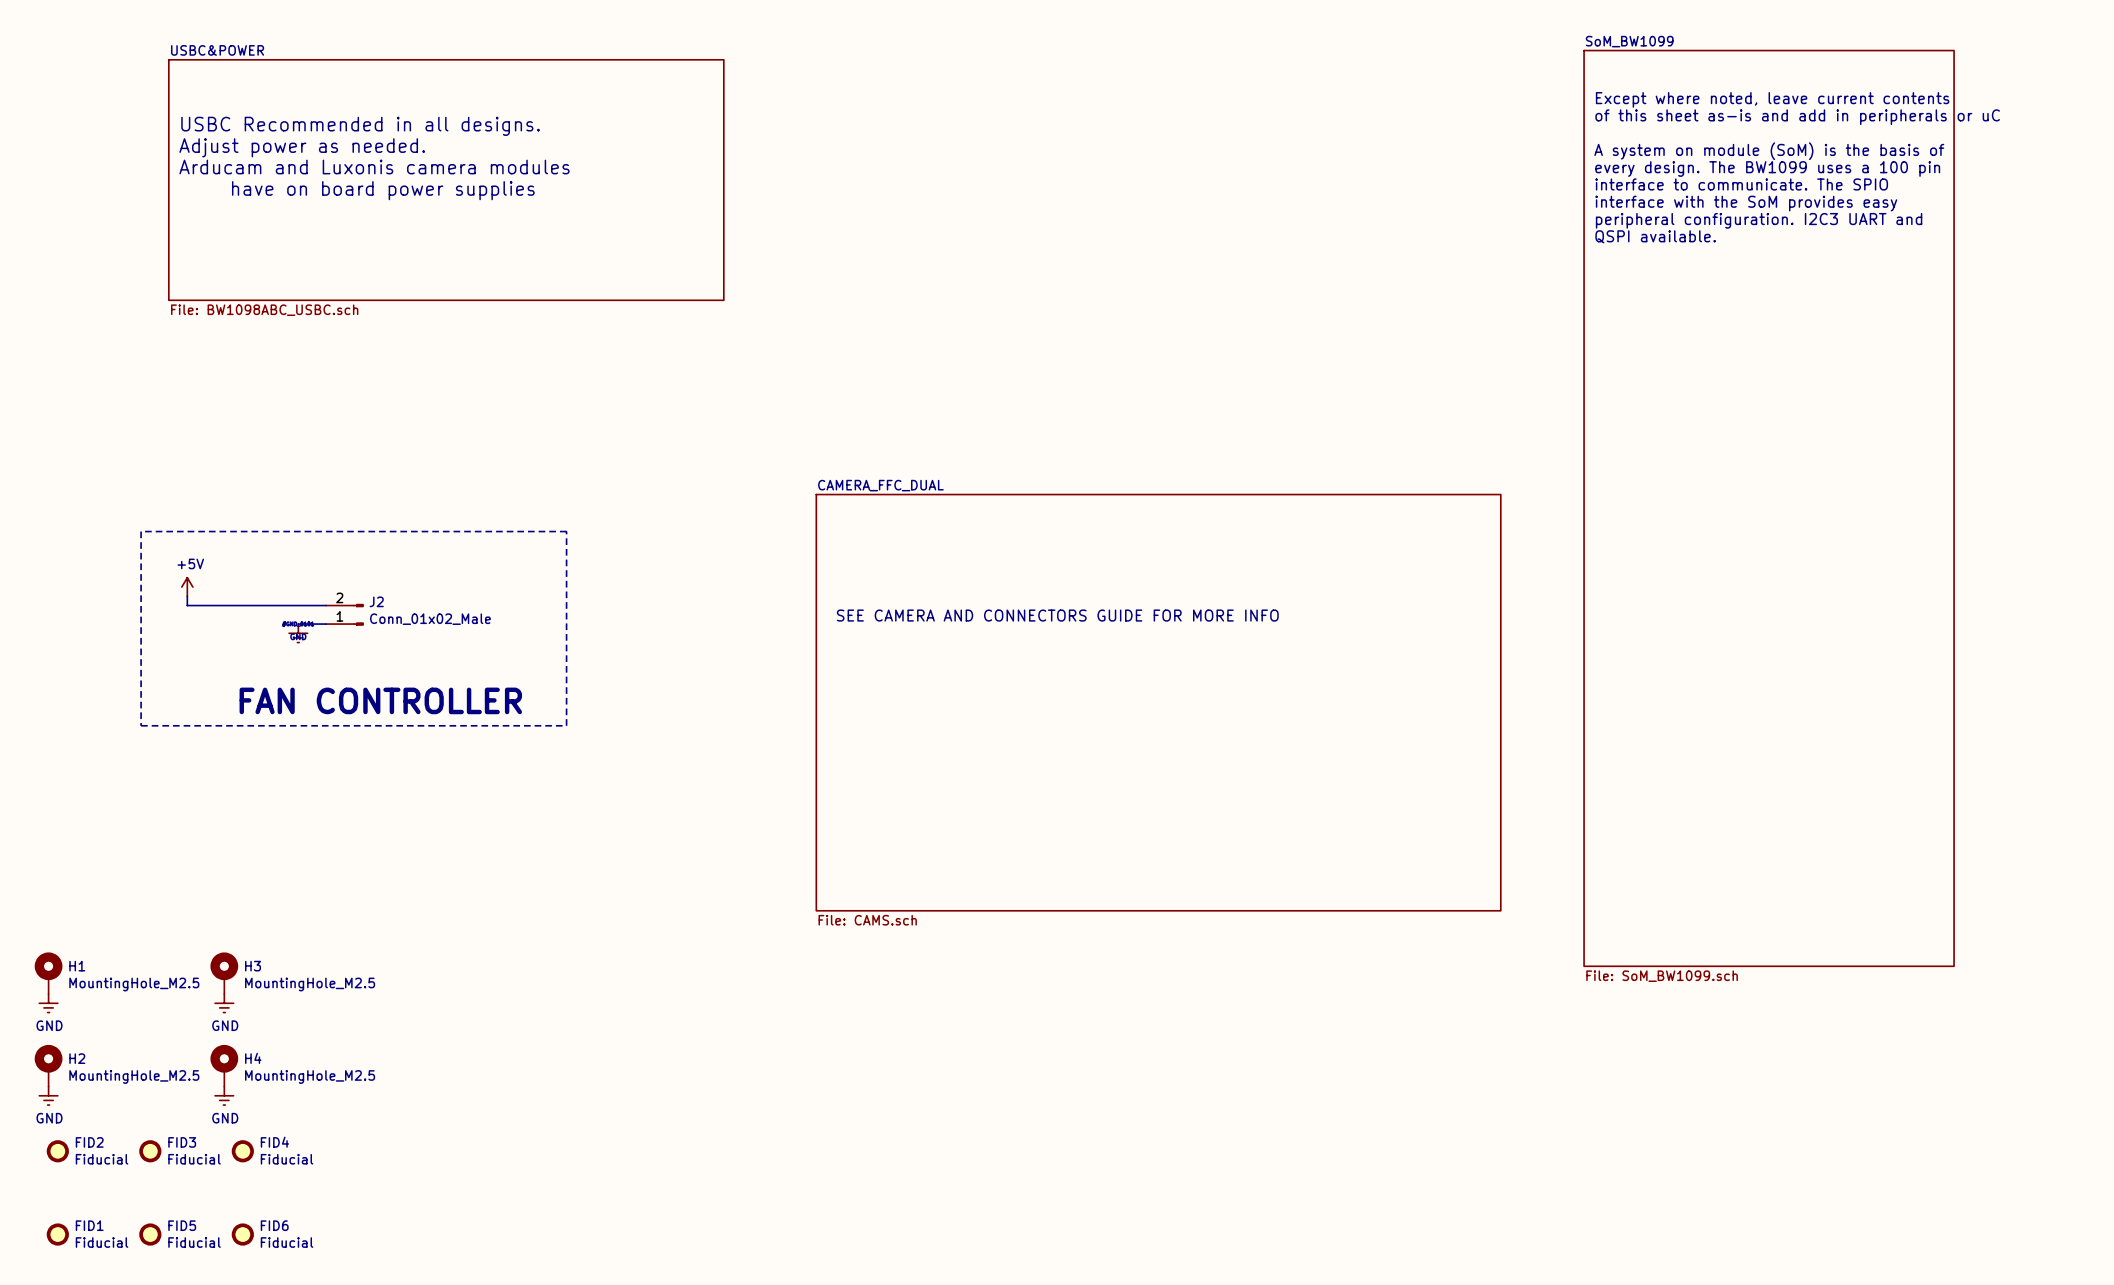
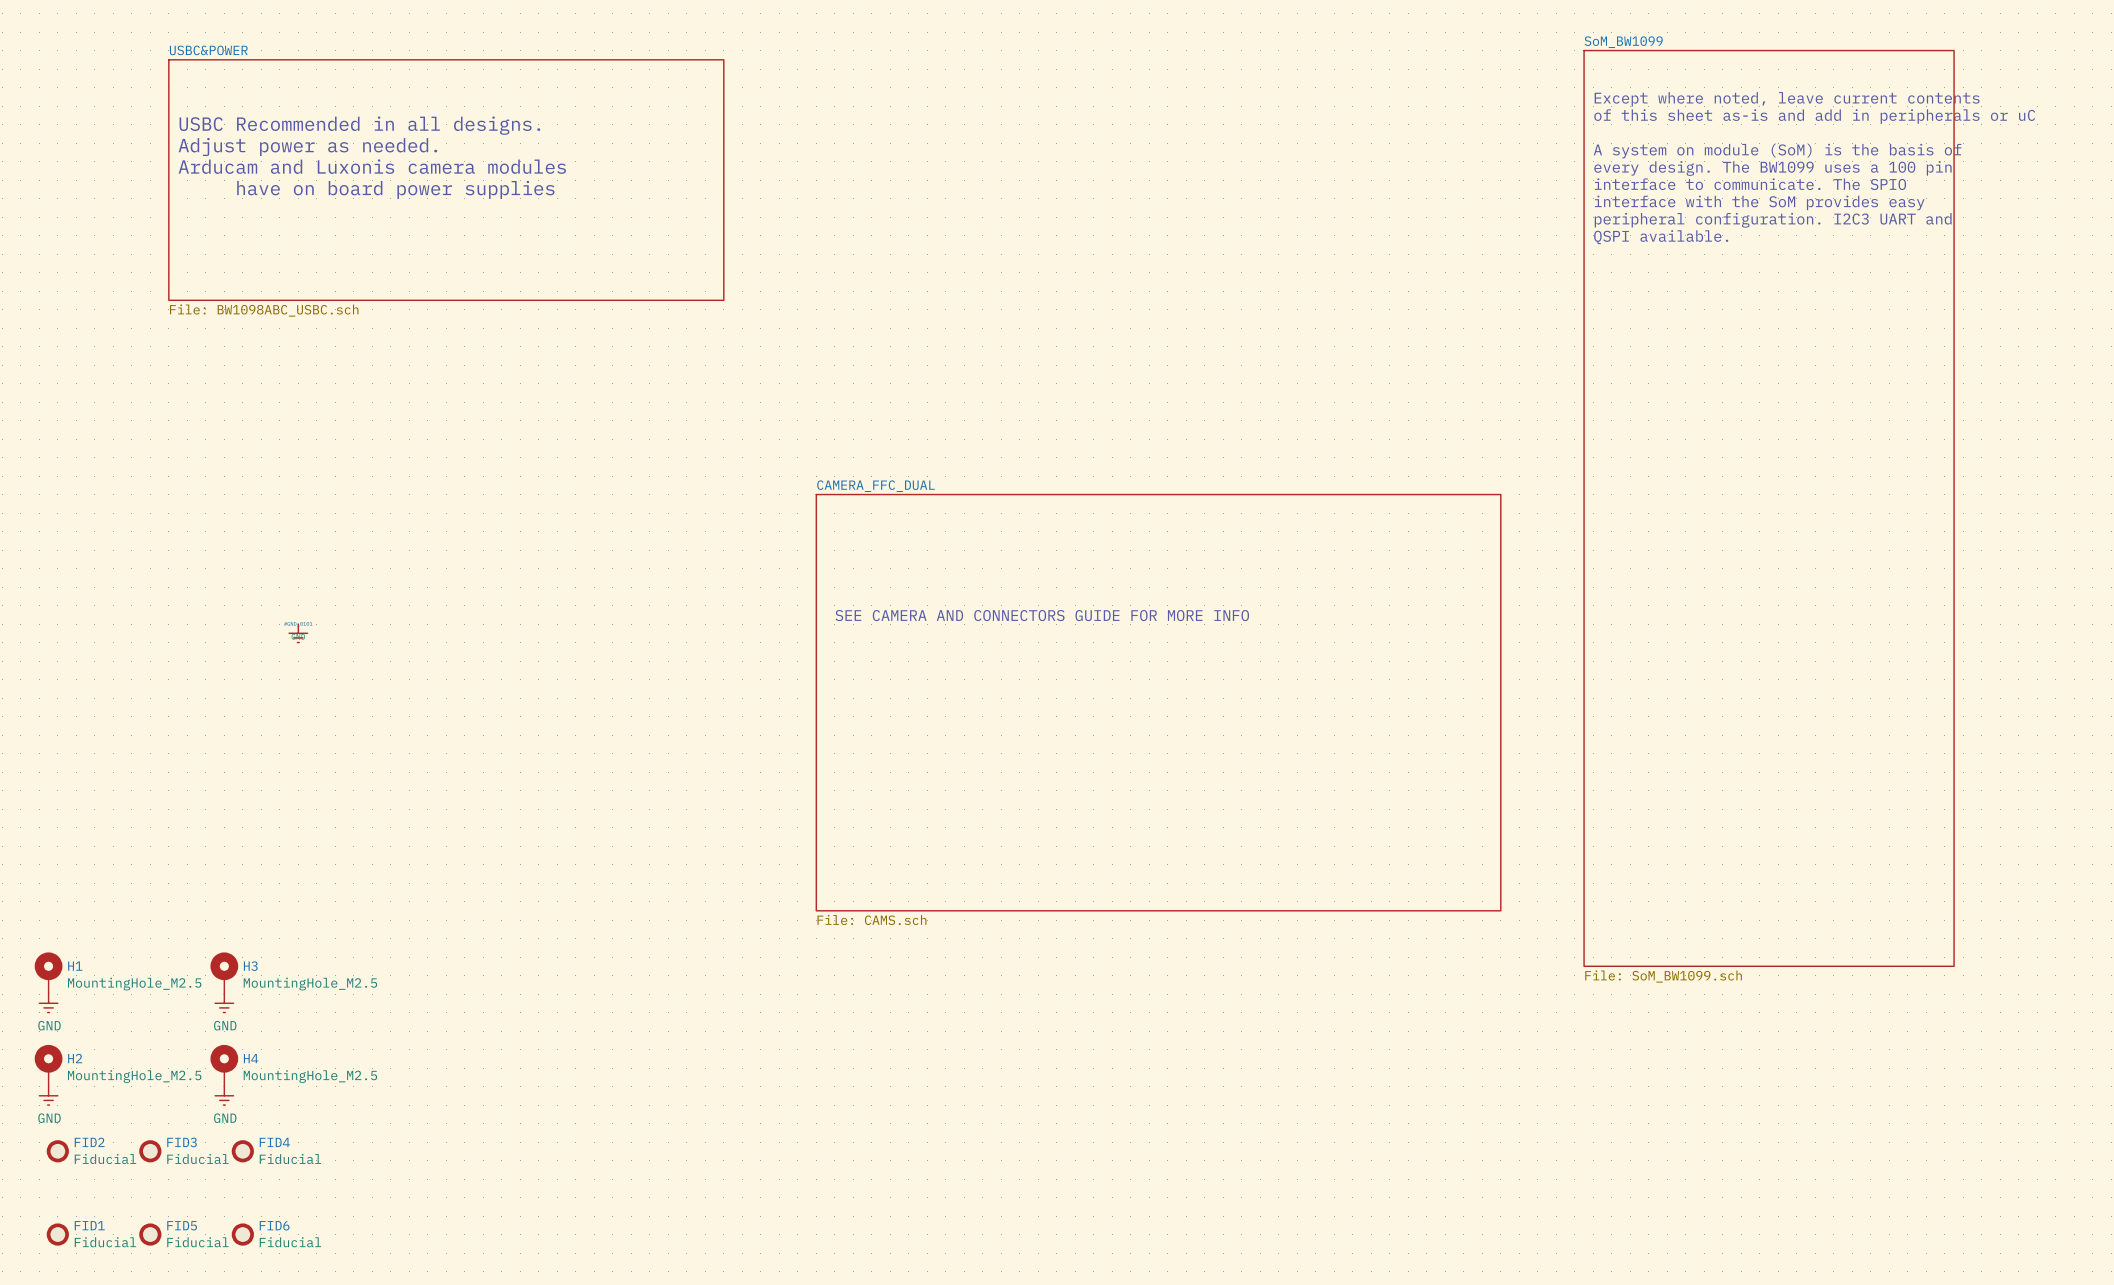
line: (141, 531) (566, 531) (566, 725) (141, 725) (141, 531) -> none
power symbol: +5V (187, 587) -> none
wire: (187, 596) (187, 605) (326, 605) -> none
J2: Conn_01x02_Male (344, 614) -> none
wire: (298, 624) (326, 624) -> none
text: FAN CONTROLLER (380, 700) -> none

